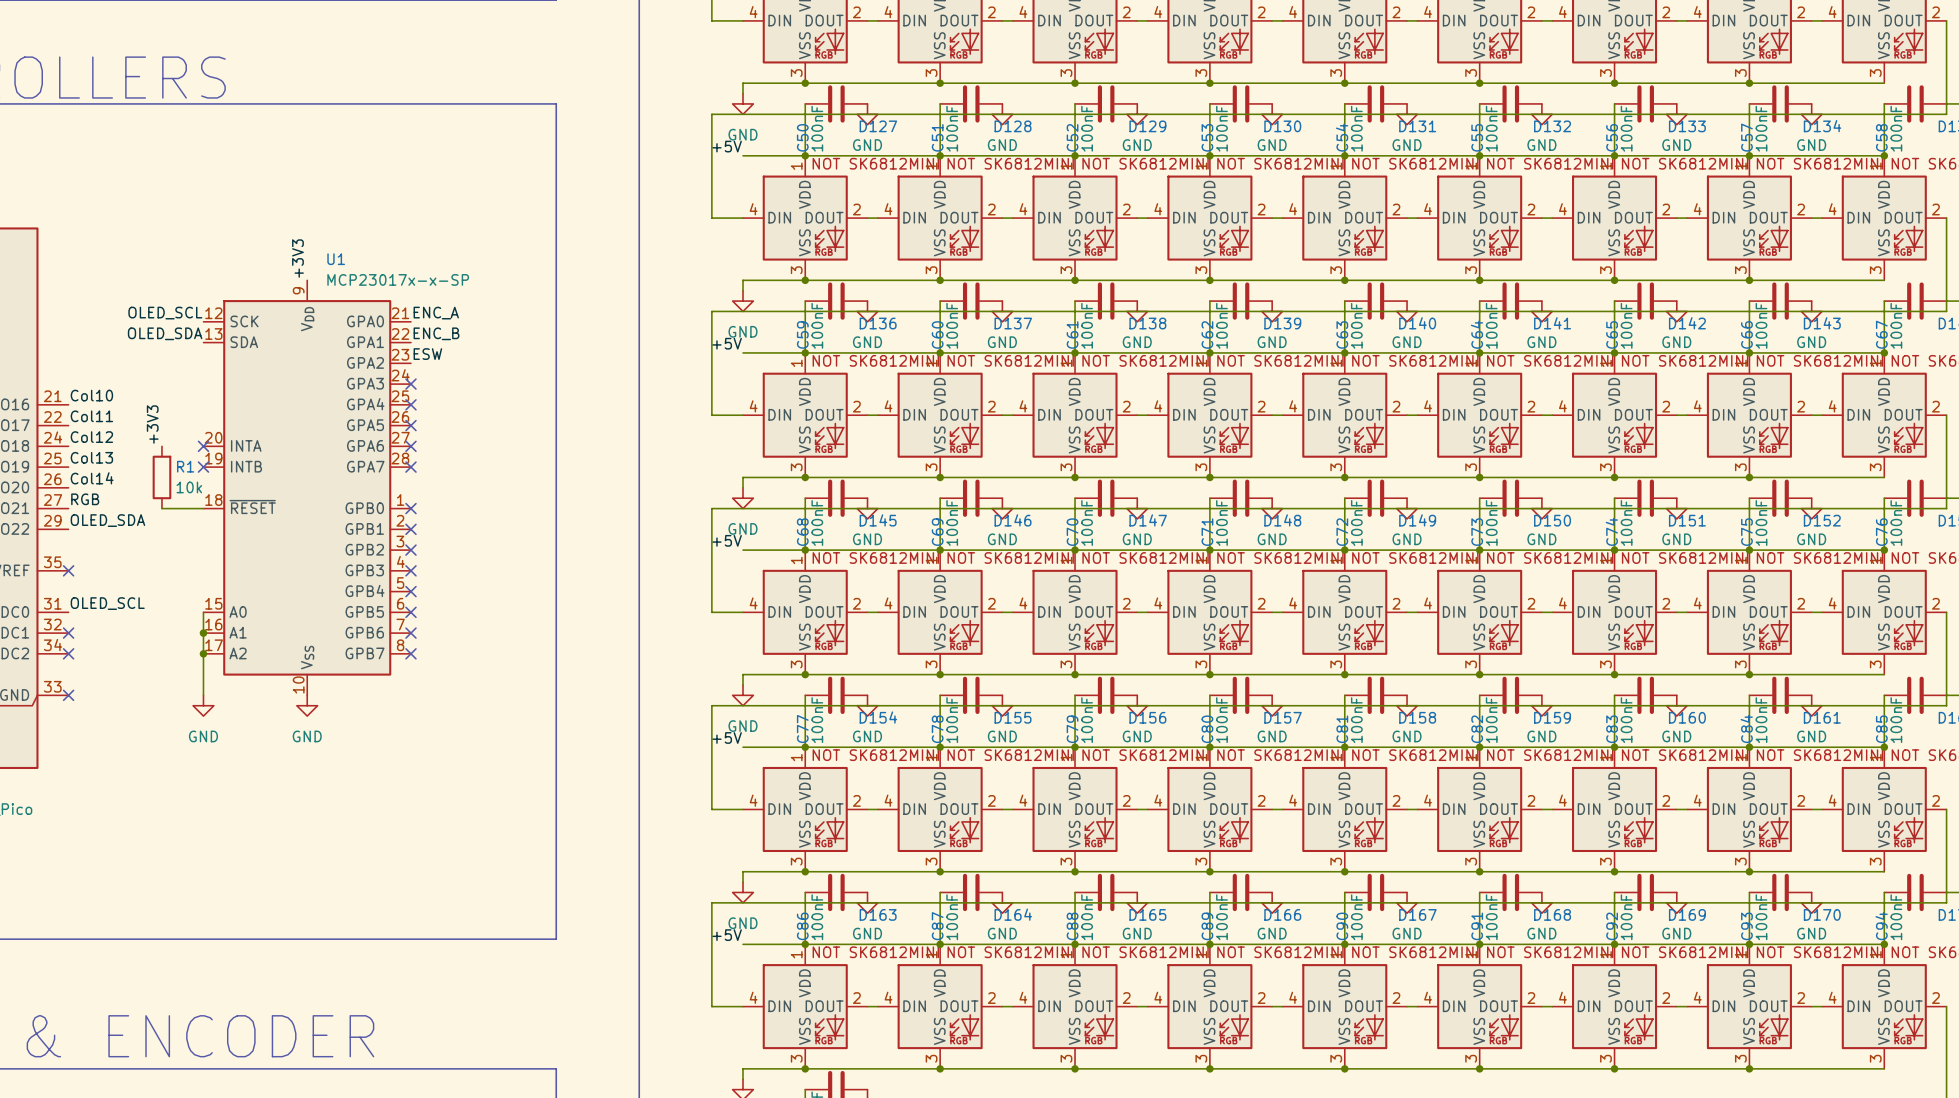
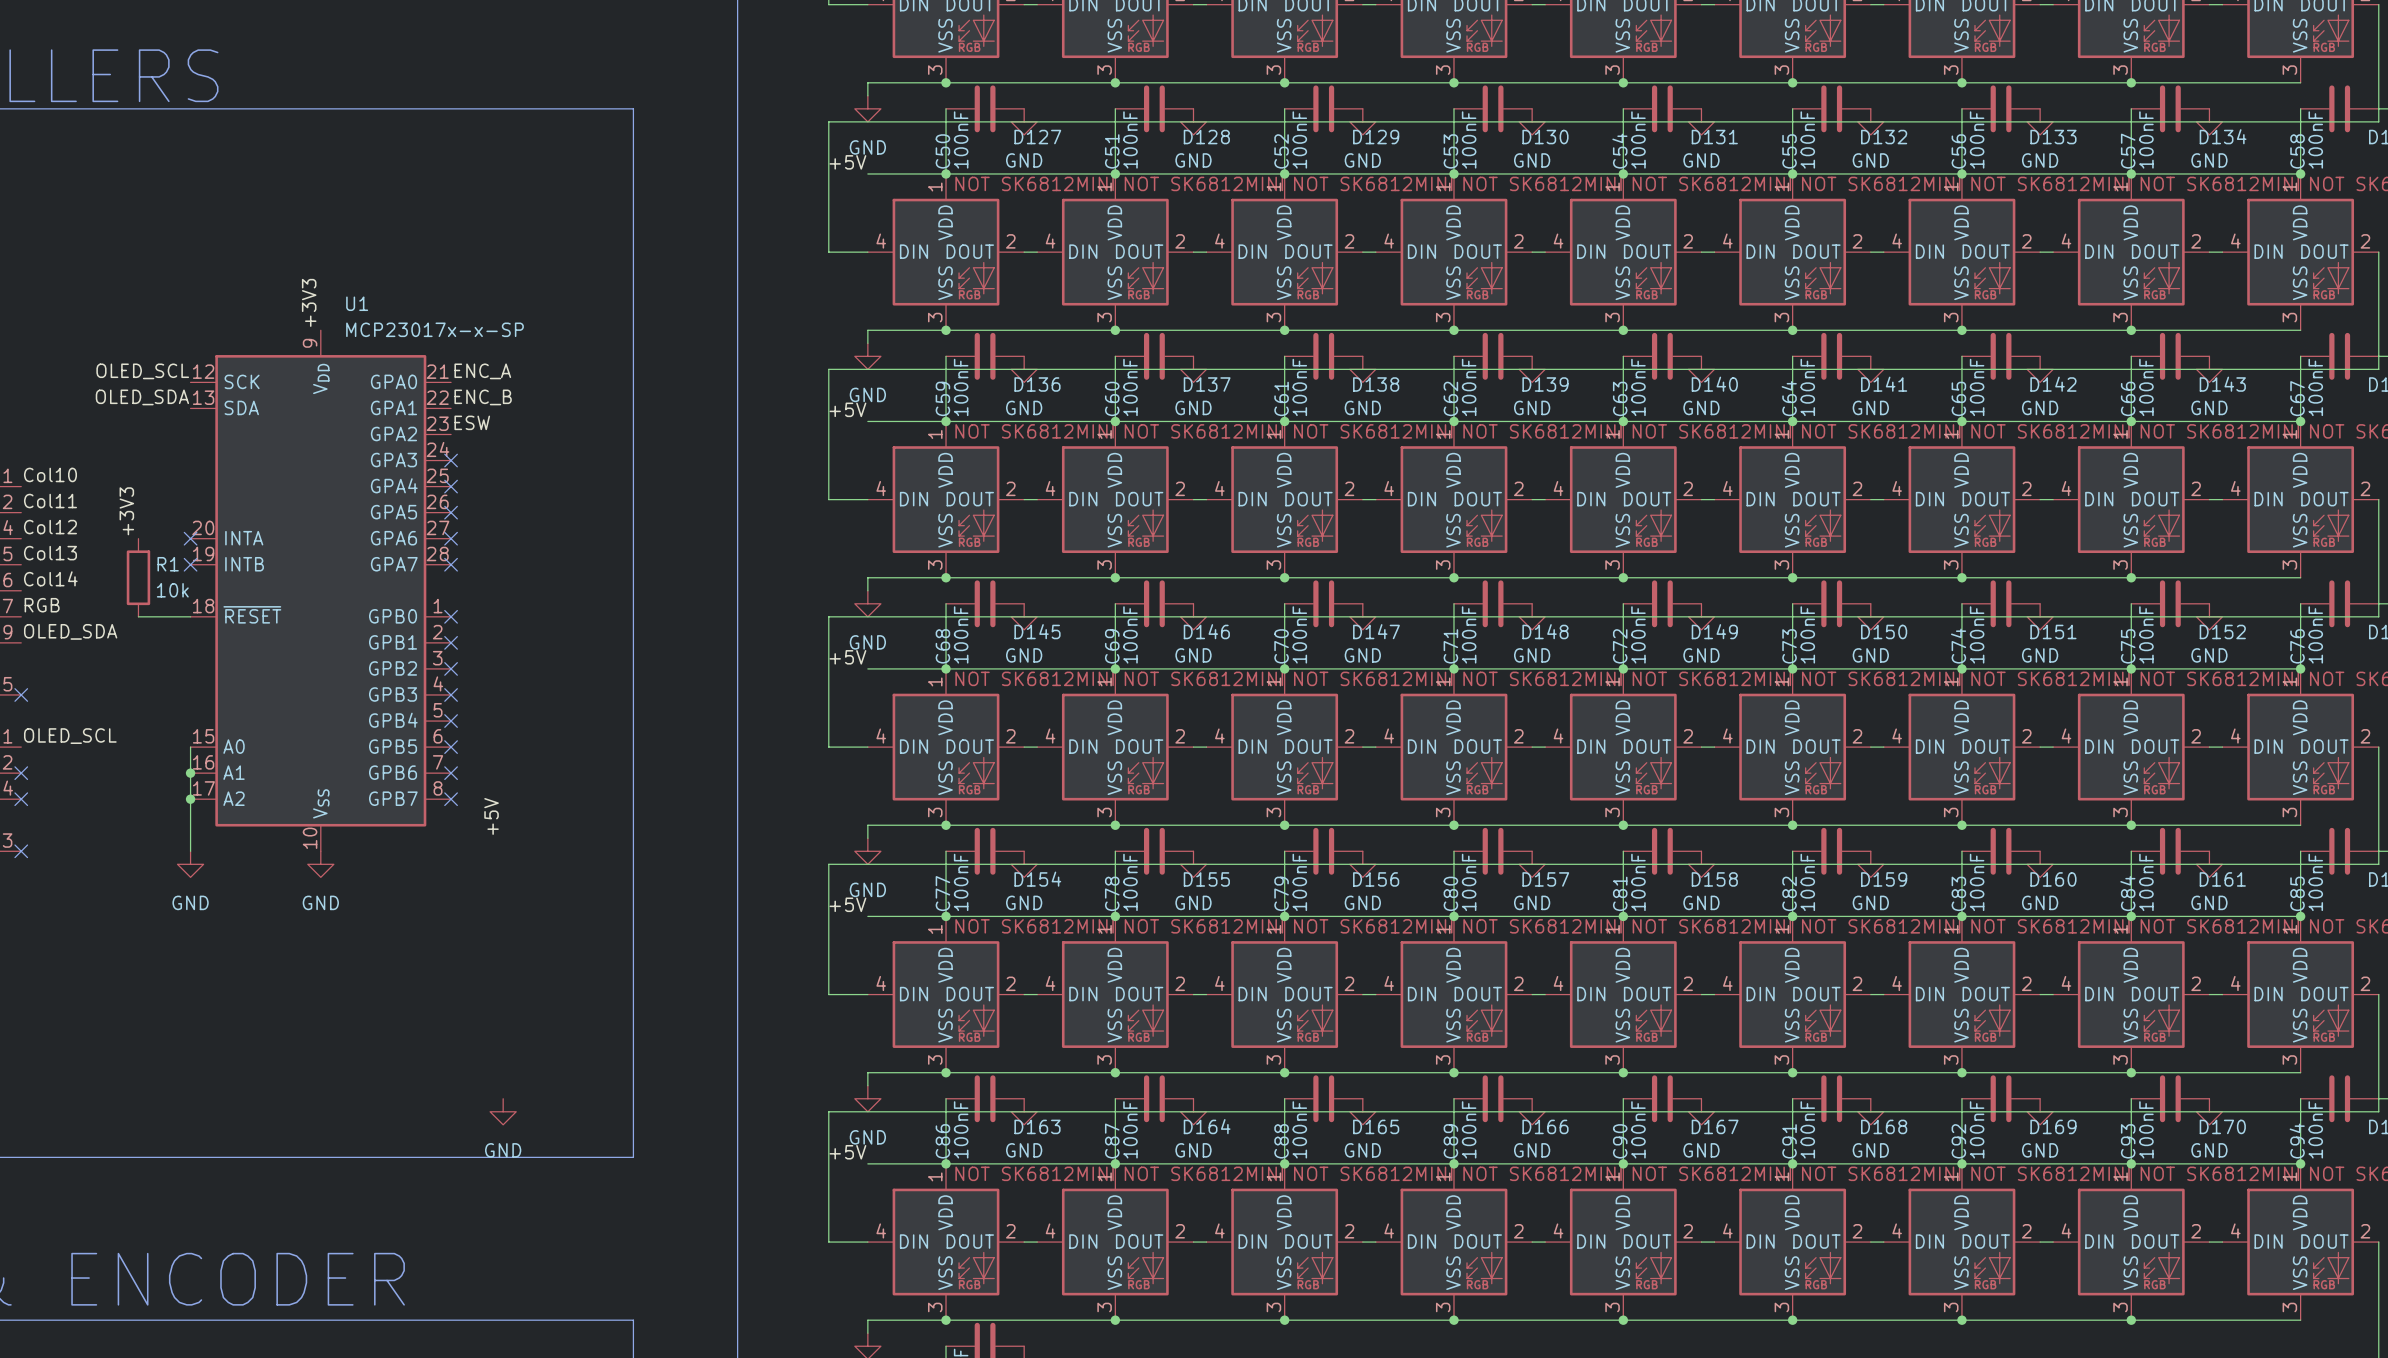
label: none -> +5V (491, 816)
power symbol: none -> GND (503, 1111)

